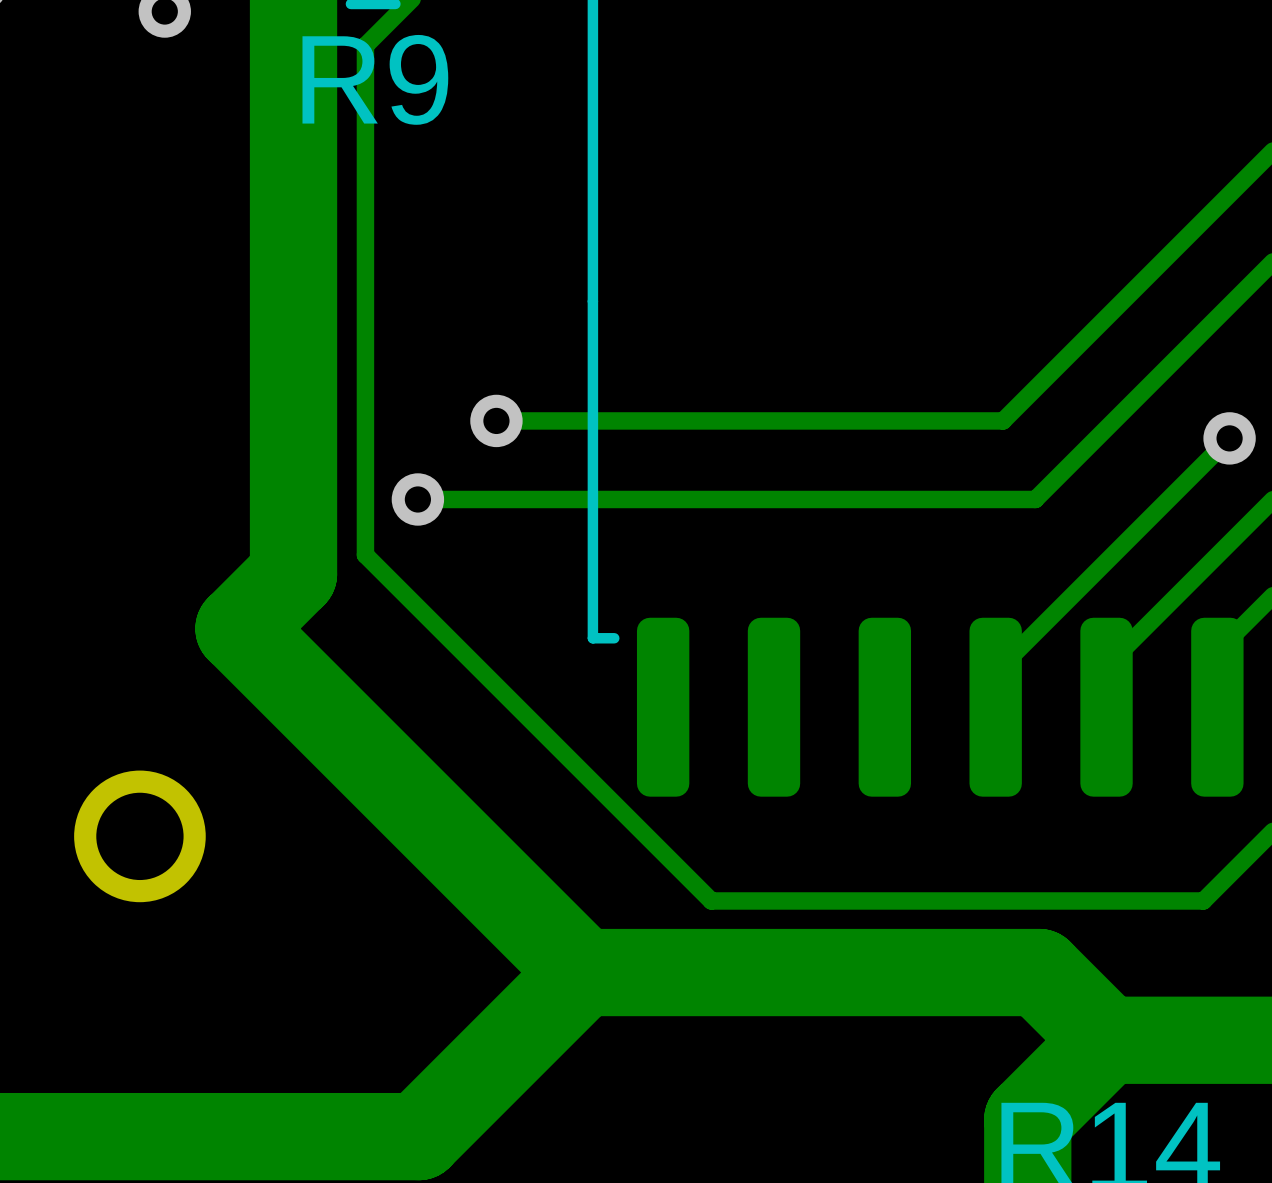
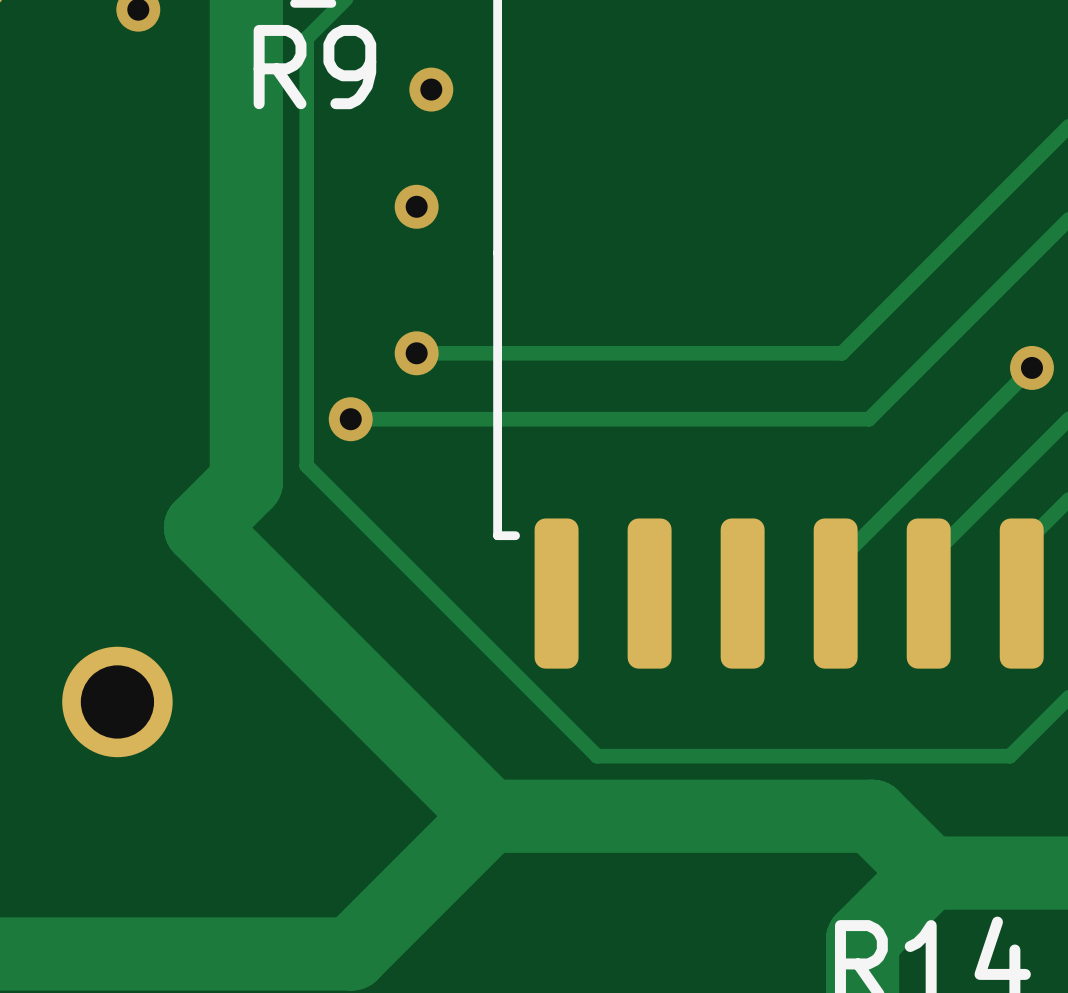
via: none -> (431, 89)
via: none -> (416, 206)

